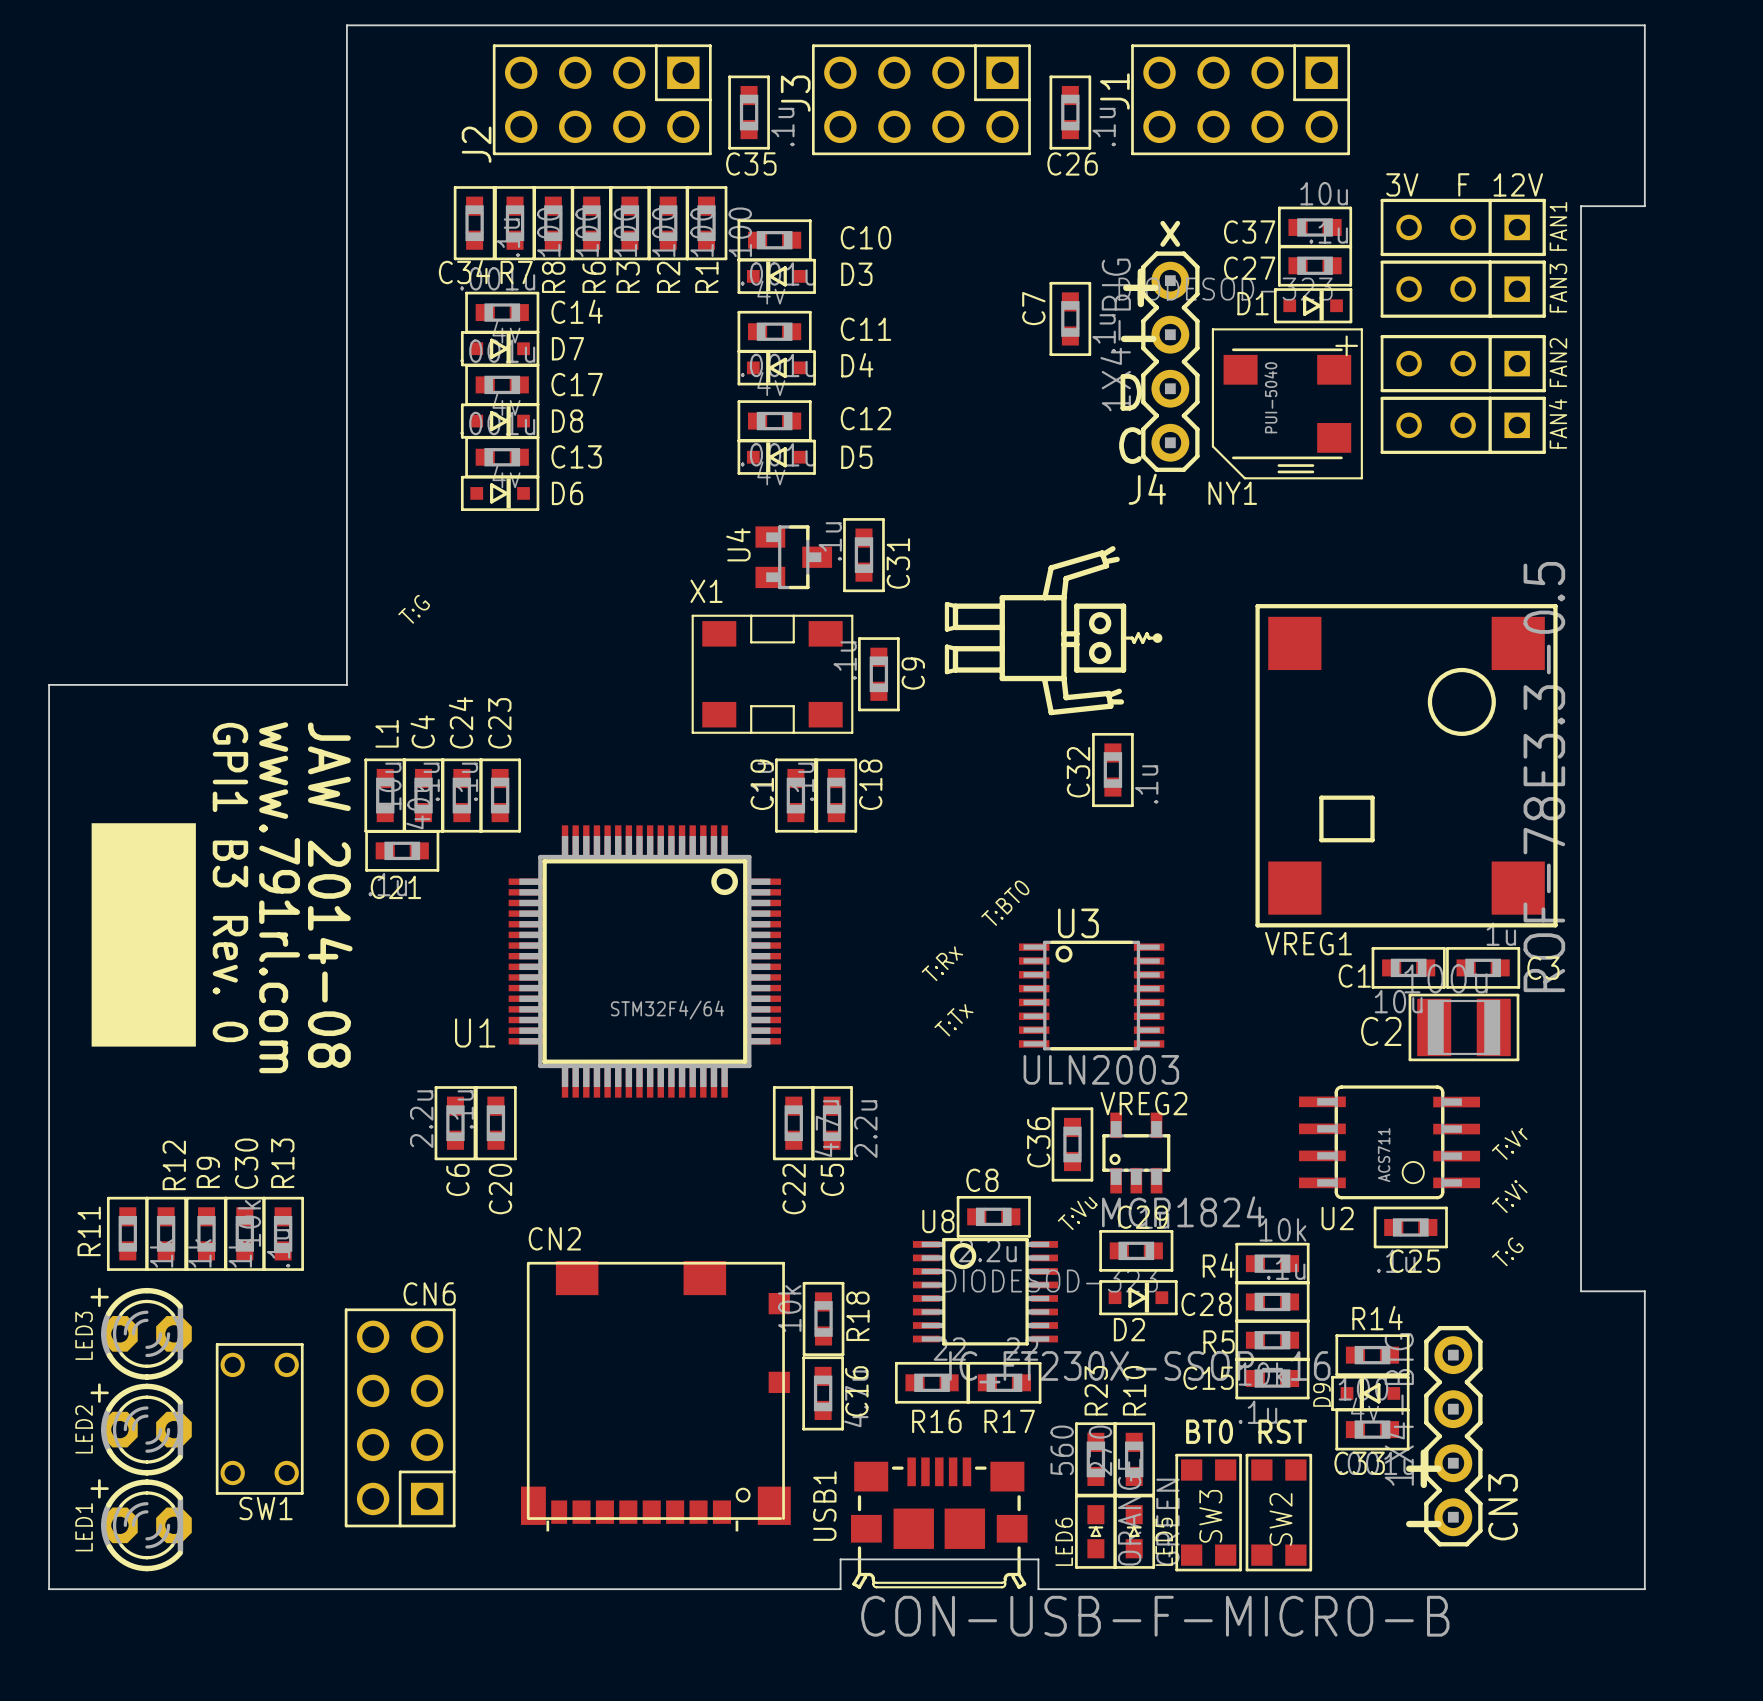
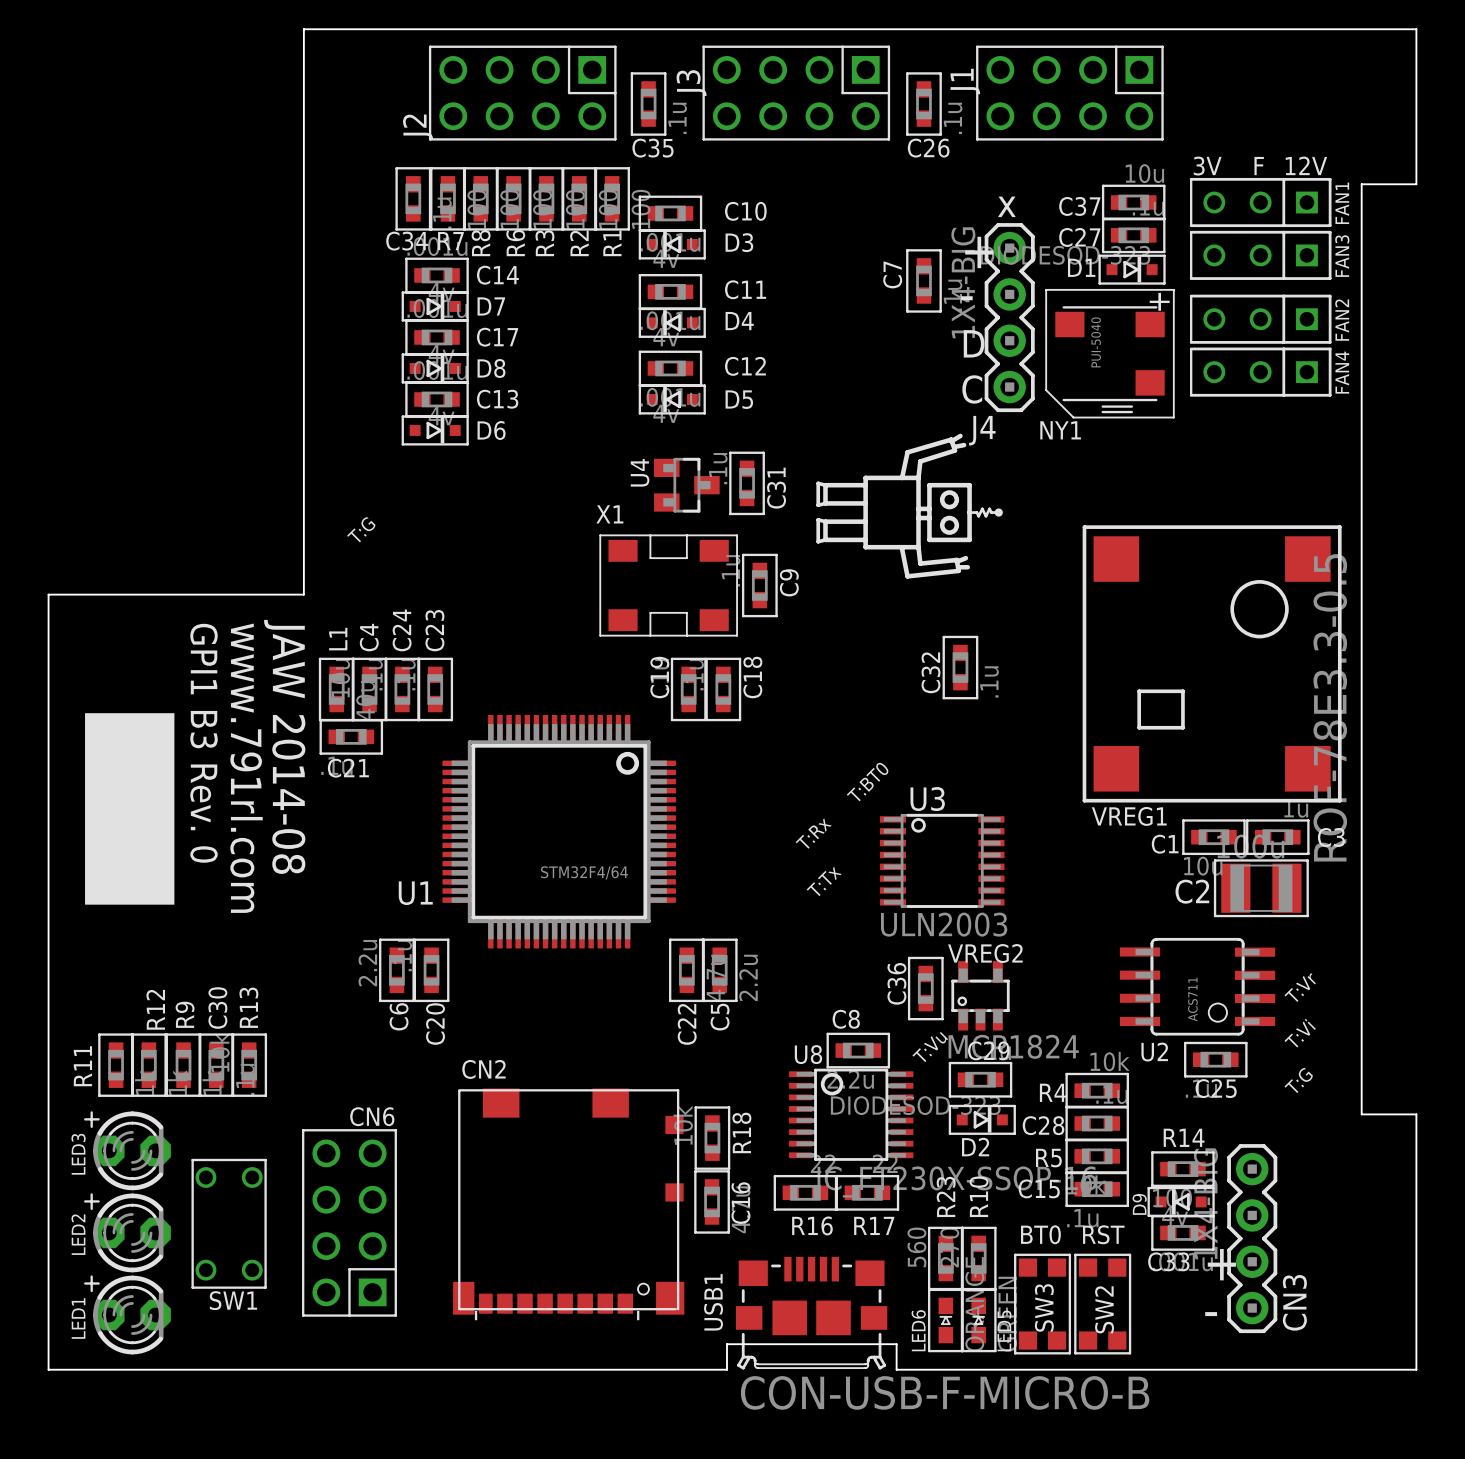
drawing position: (1053, 630) -> (909, 506)

